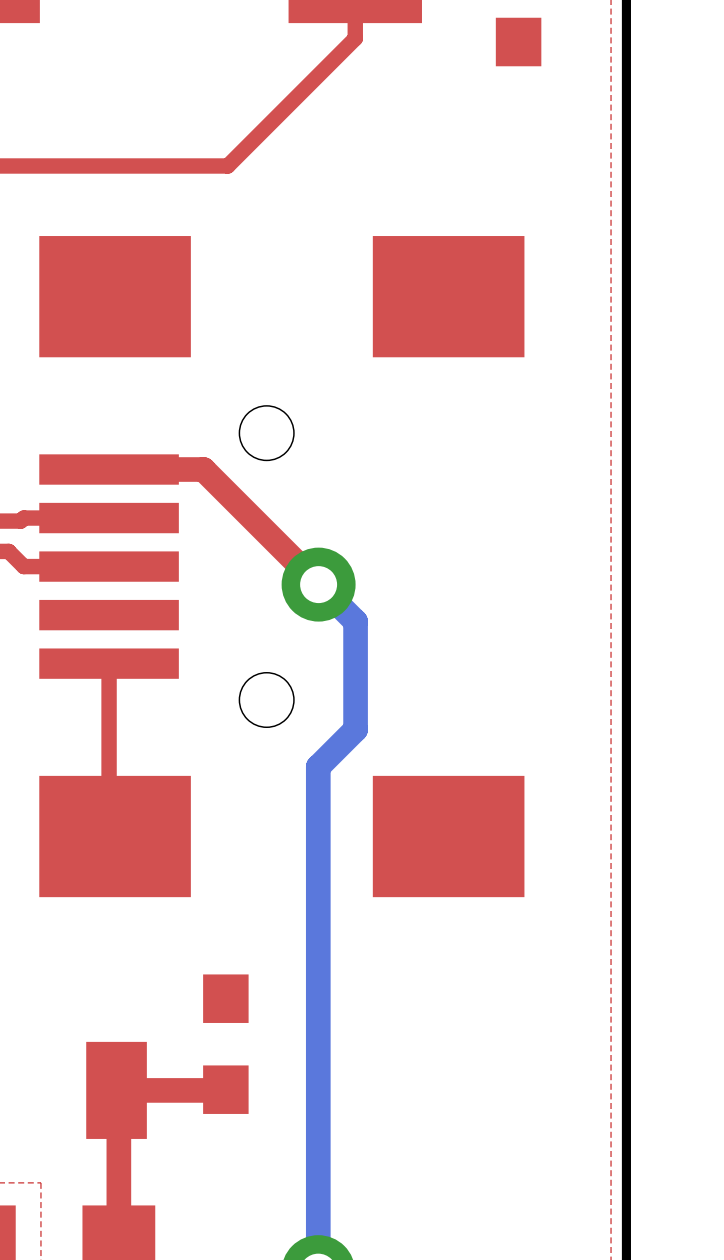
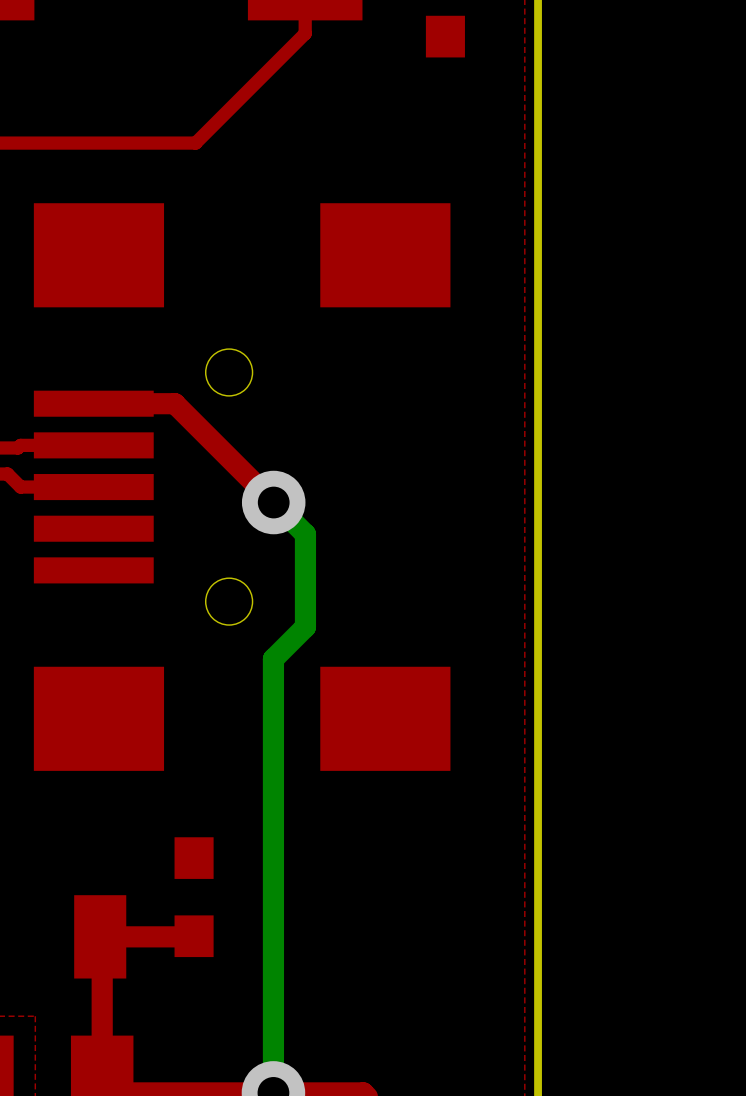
top track: (109, 663) (109, 830) (115, 836) -> none

